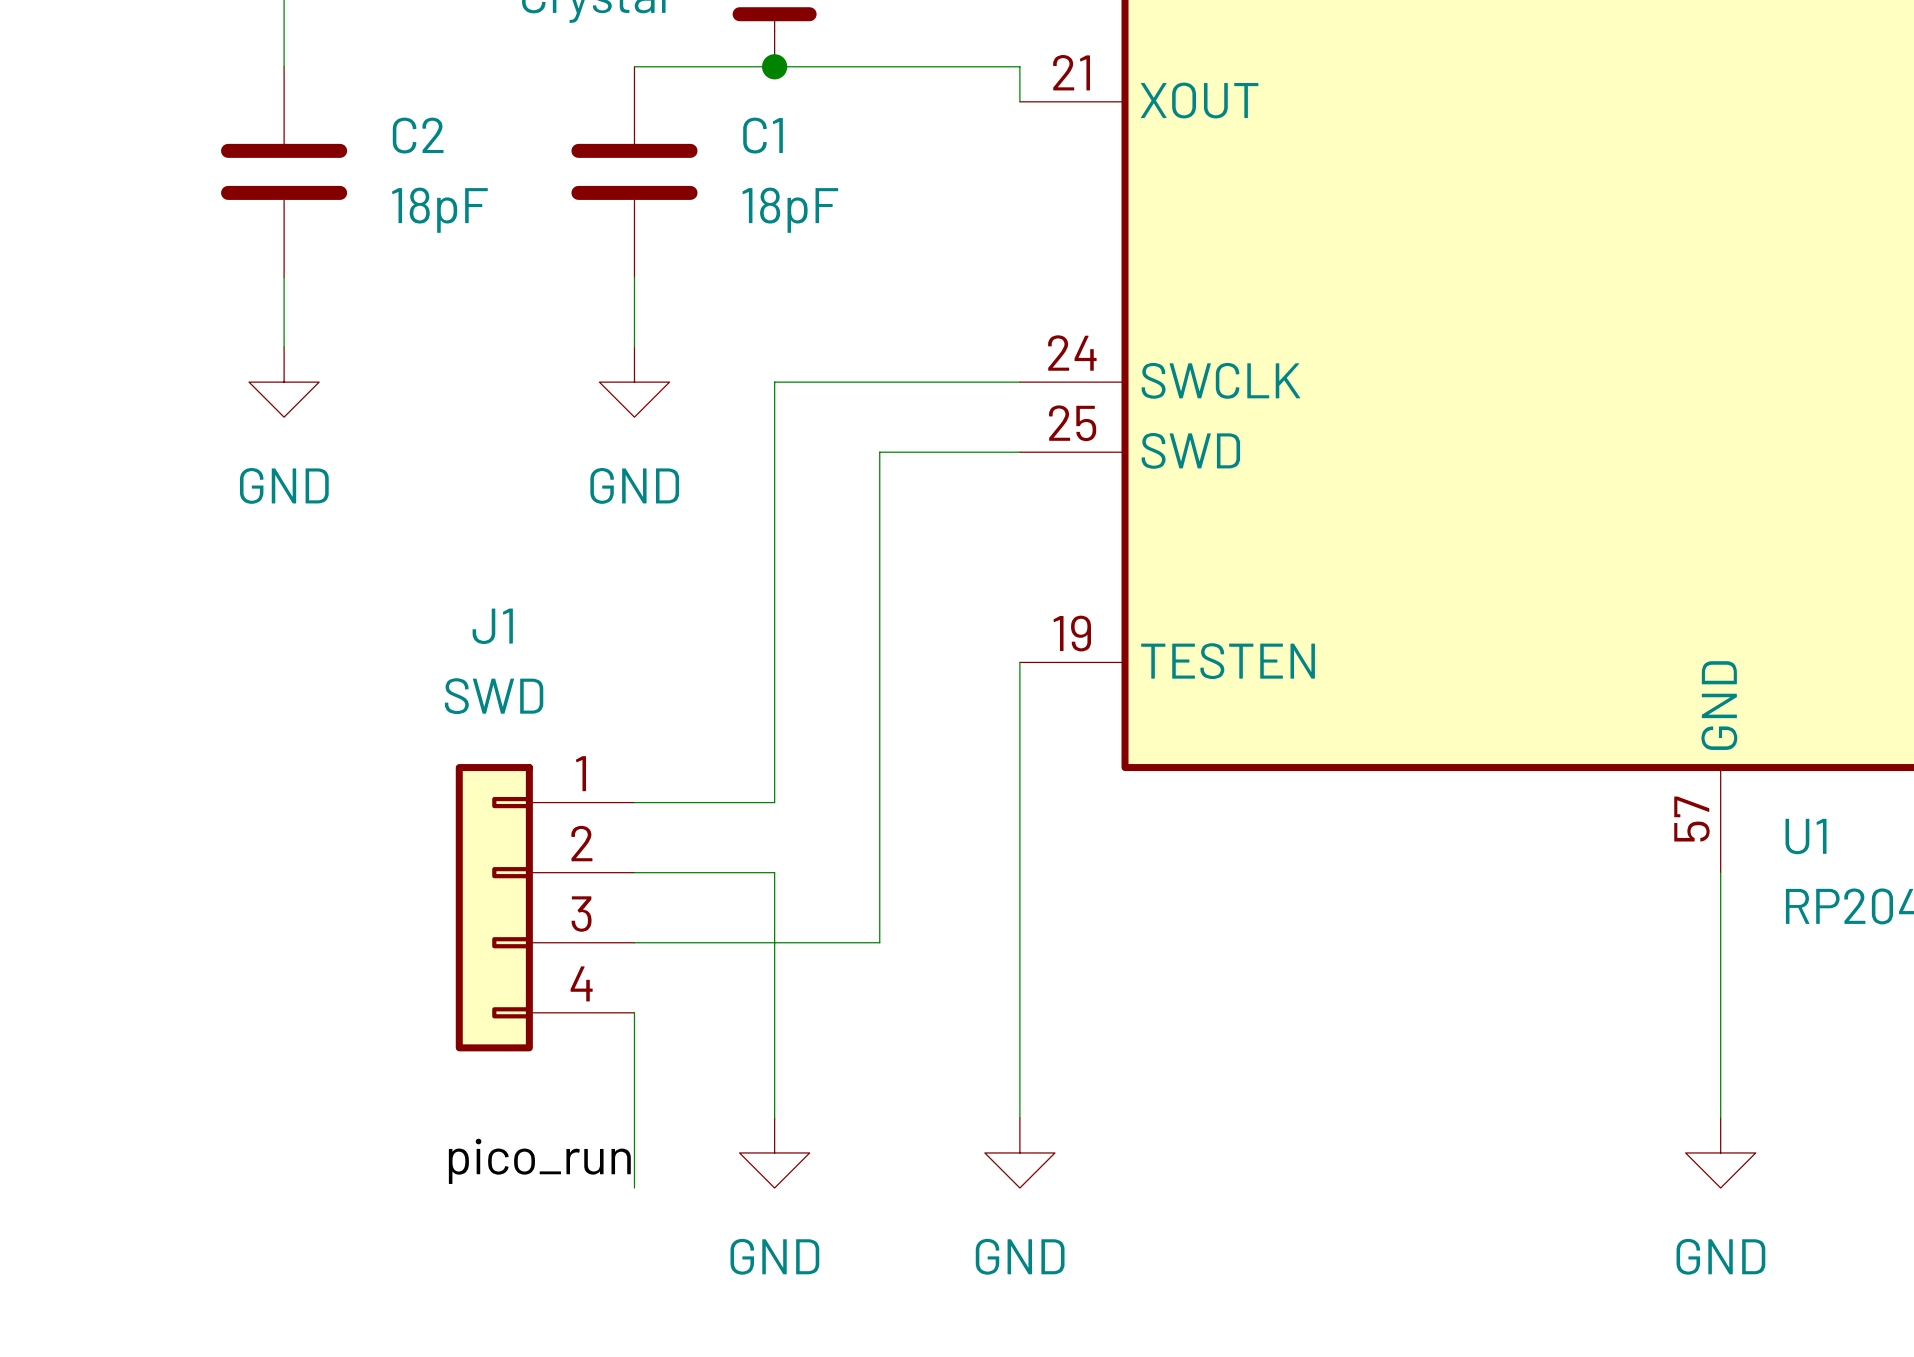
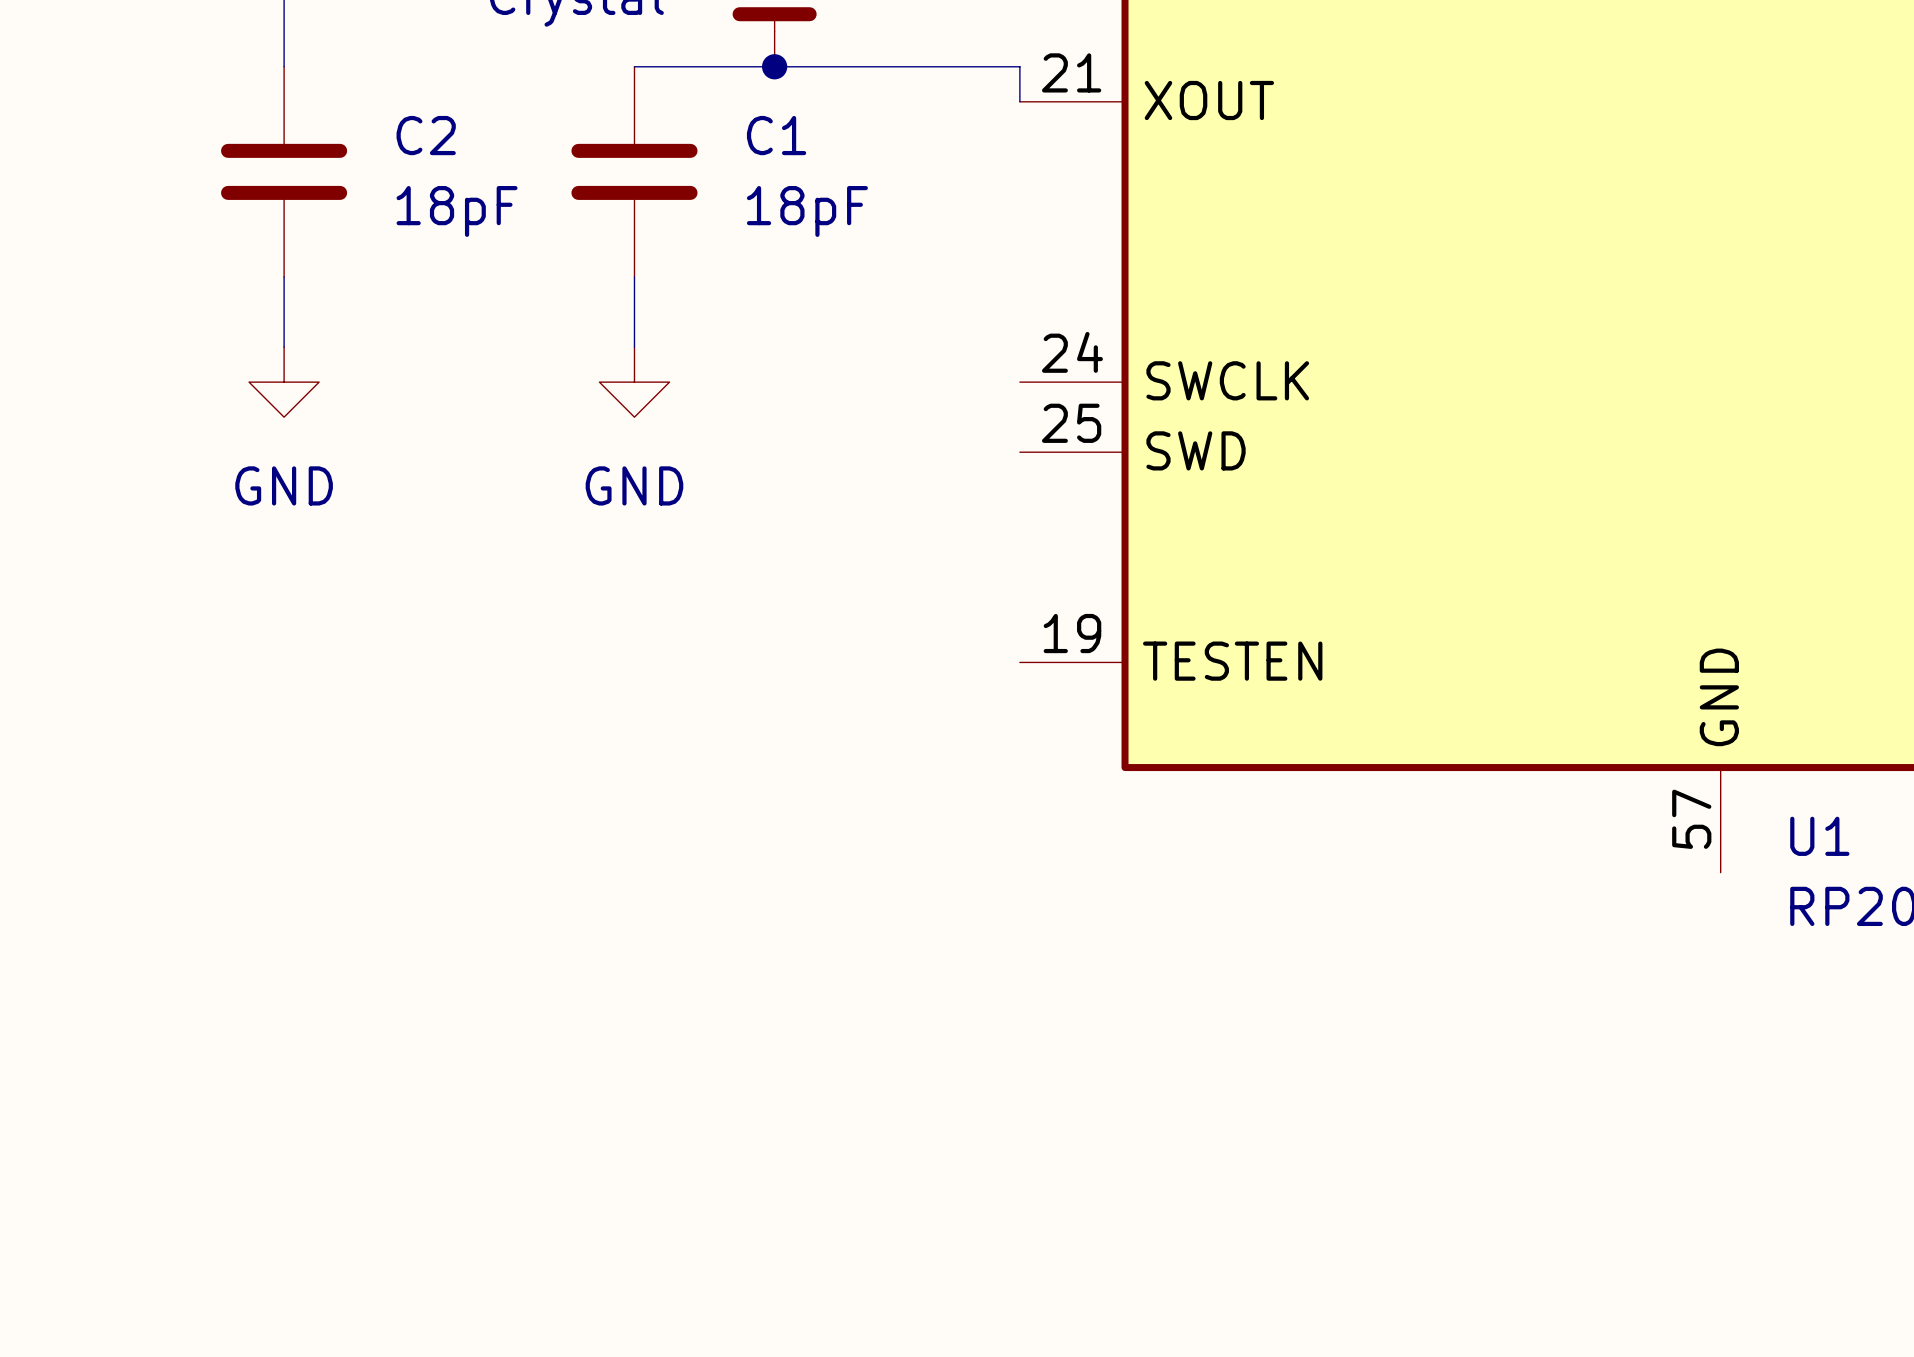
wire: (1019, 382) (774, 382) (774, 802) (634, 802) -> none
wire: (1019, 452) (879, 452) (879, 942) (634, 942) -> none
wire: (1019, 662) (1019, 1117) -> none
wire: (634, 872) (774, 872) (774, 1117) -> none
wire: (1720, 872) (1720, 1117) -> none
J1: SWD (545, 907) -> none
wire: (634, 1012) (634, 1188) -> none
power symbol: GND (774, 1152) -> none
power symbol: GND (1019, 1152) -> none
power symbol: GND (1720, 1152) -> none
label: pico_run (539, 1161) -> none

